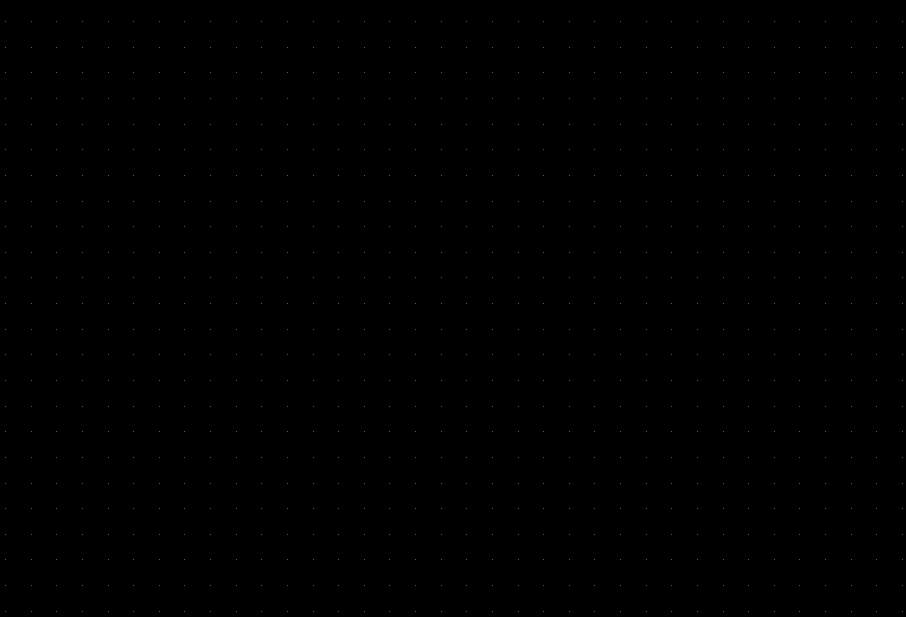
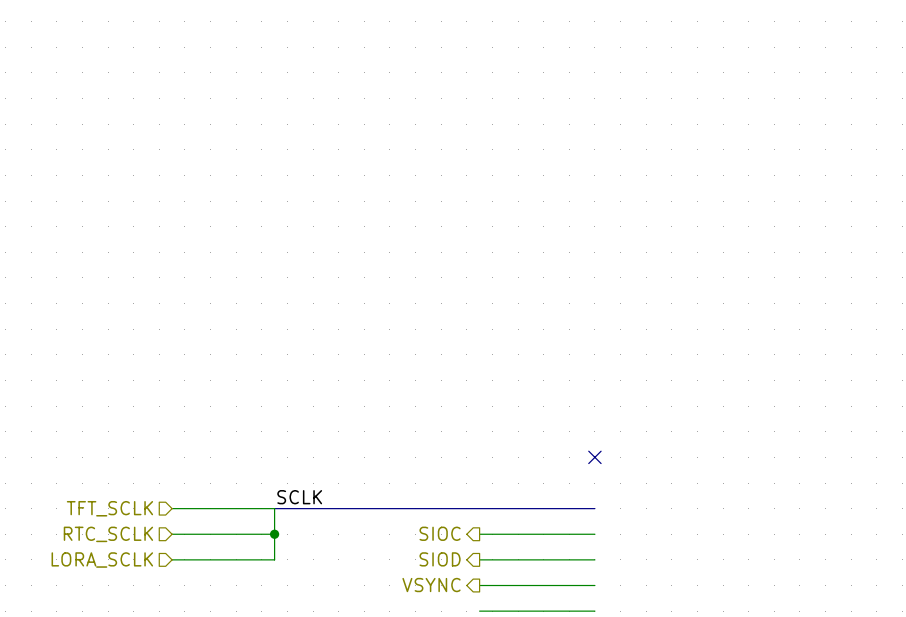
no-connect mark: none -> (594, 457)
label: none -> SCLK (299, 497)
hierarchical label: none -> TFT_SCLK (109, 508)
wire: none -> (172, 508) (274, 508) (274, 559) (172, 559)
bus: none -> (274, 508) (594, 508)
hierarchical label: none -> SIOC (440, 533)
hierarchical label: none -> RTC_SCLK (108, 534)
wire: none -> (172, 534) (274, 534)
junction: none -> (274, 534)
wire: none -> (479, 534) (594, 534)
hierarchical label: none -> SIOD (440, 559)
wire: none -> (479, 559) (594, 559)
hierarchical label: none -> LORA_SCLK (102, 560)
hierarchical label: none -> VSYNC (431, 585)
wire: none -> (479, 585) (594, 585)
wire: none -> (479, 611) (594, 611)

